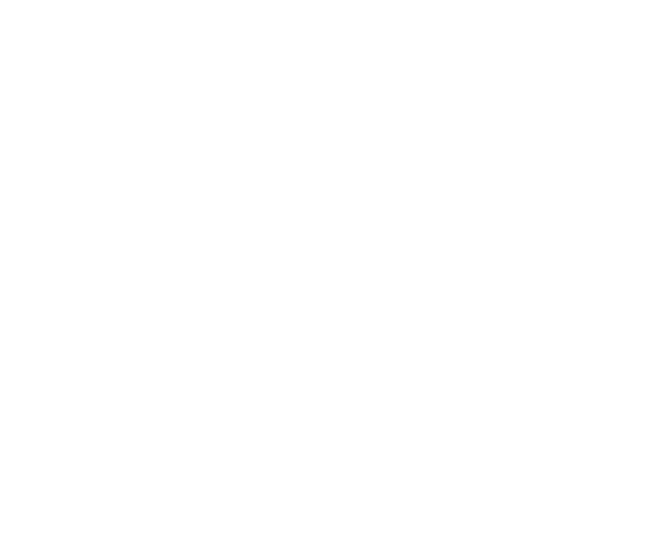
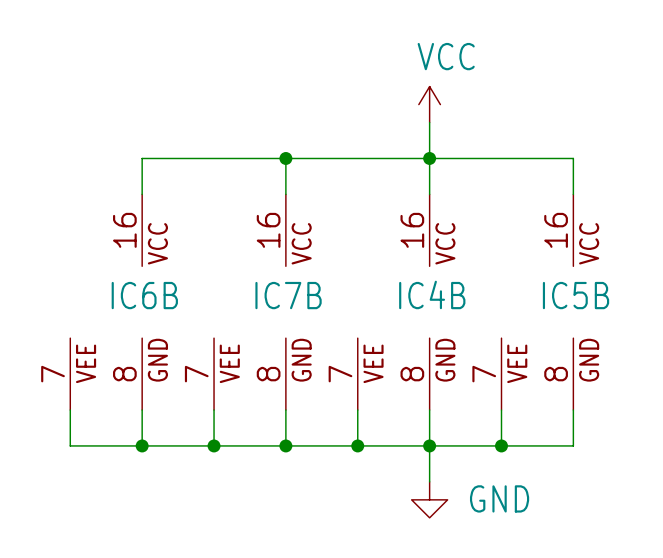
power symbol: none -> VCC (429, 104)
wire: none -> (429, 122) (429, 194)
wire: none -> (285, 158) (285, 194)
junction: none -> (285, 158)
junction: none -> (429, 158)
wire: none -> (142, 194) (142, 158) (573, 158) (573, 194)
IC6B: none -> (106, 302)
IC7B: none -> (249, 302)
IC4B: none -> (393, 302)
IC5B: none -> (537, 302)
wire: none -> (70, 410) (70, 445) (573, 445) (573, 410)
wire: none -> (142, 410) (142, 445)
wire: none -> (214, 410) (214, 445)
wire: none -> (285, 410) (285, 445)
wire: none -> (357, 410) (357, 445)
wire: none -> (429, 410) (429, 481)
wire: none -> (501, 410) (501, 445)
junction: none -> (142, 445)
junction: none -> (214, 445)
junction: none -> (285, 445)
junction: none -> (357, 445)
junction: none -> (429, 445)
junction: none -> (501, 445)
power symbol: none -> GND (429, 499)

